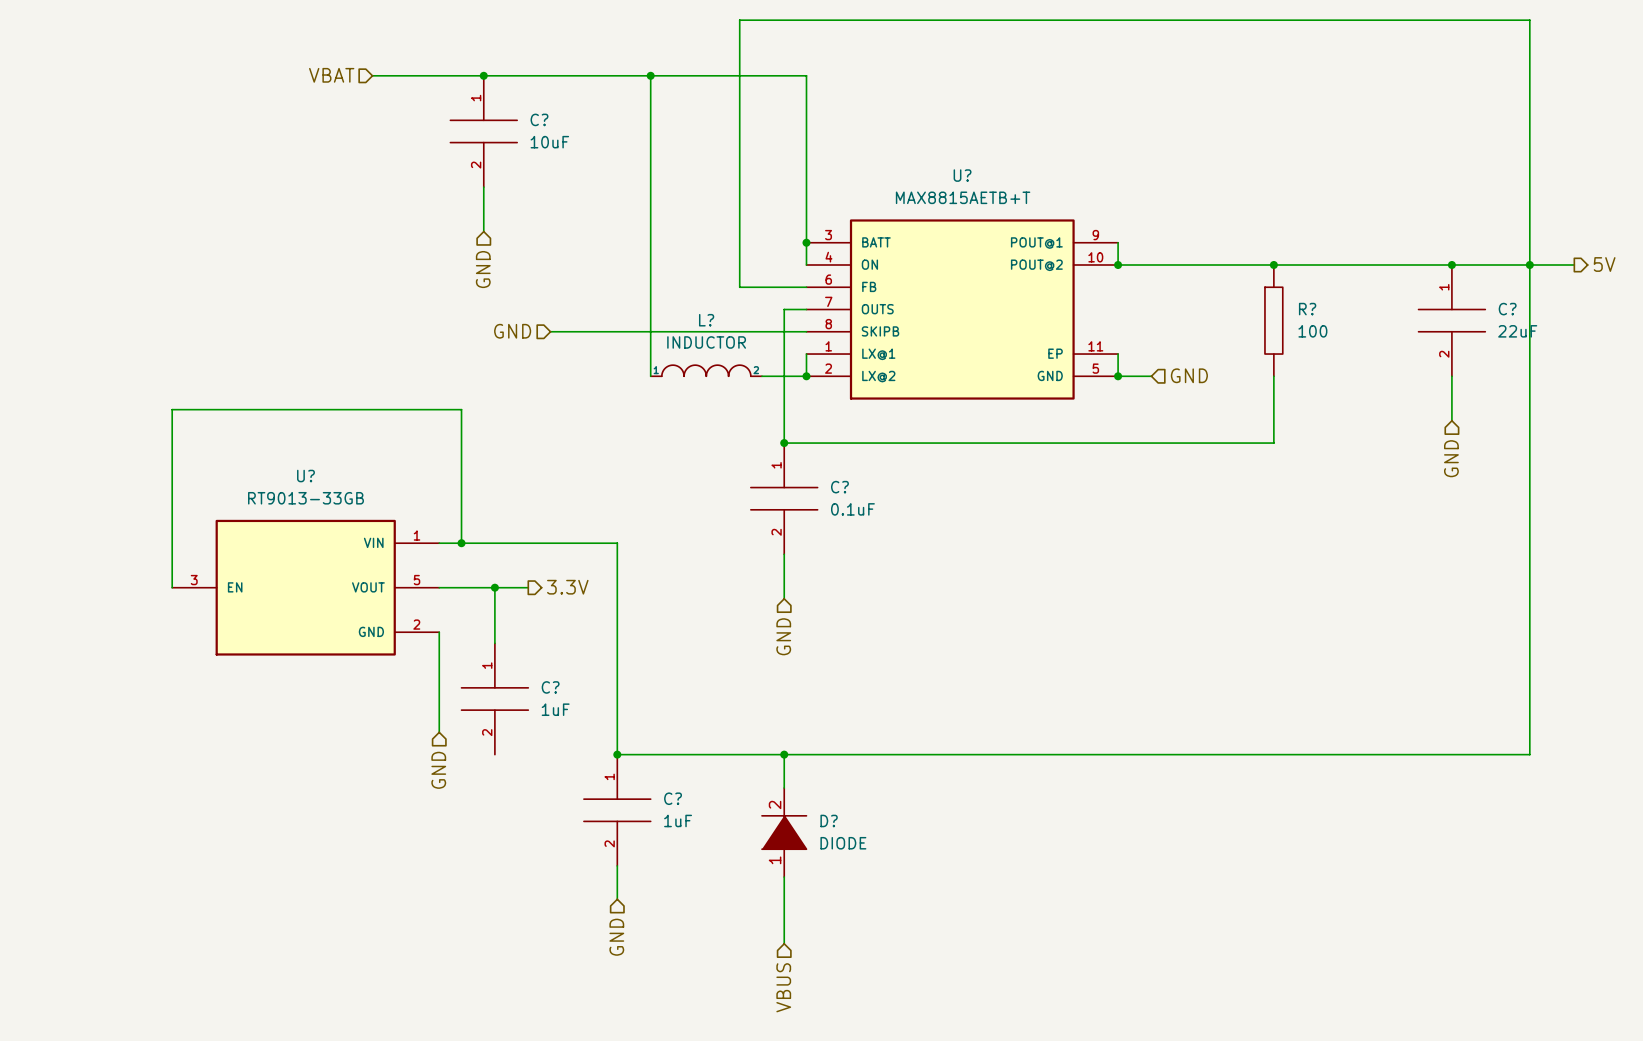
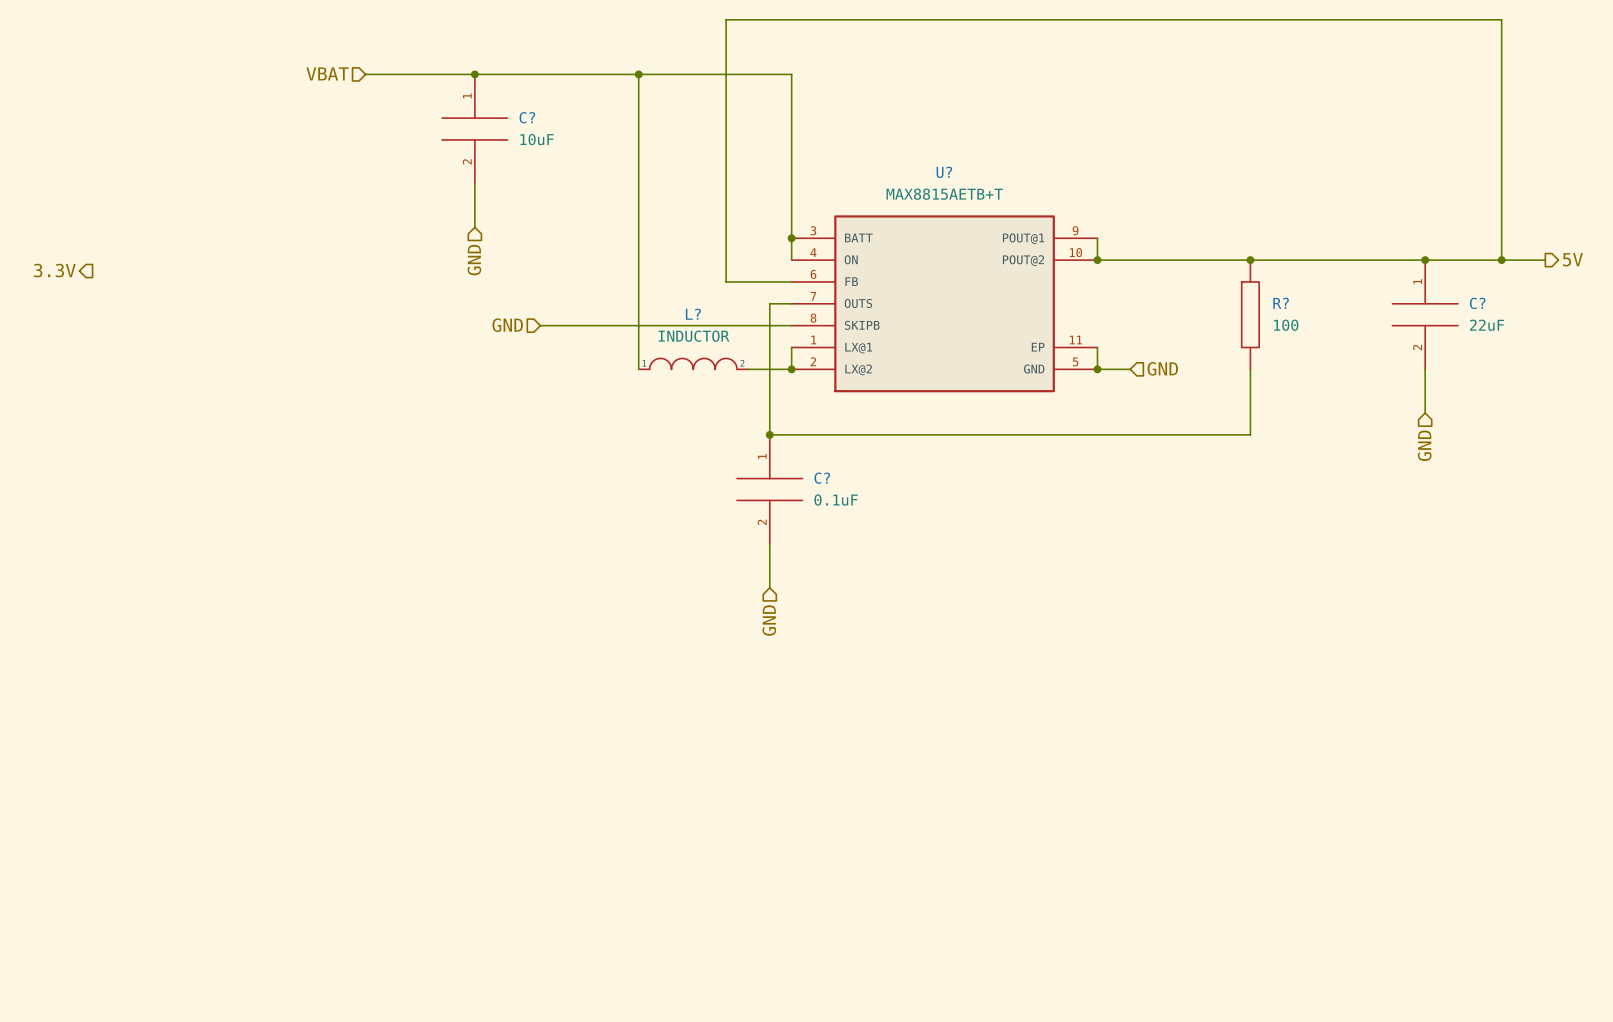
wire: (1529, 264) (1529, 754) (617, 754) (617, 543) (439, 543) -> none
hierarchical label: none -> 3.3V (54, 270)
wire: (461, 543) (461, 409) (172, 409) (172, 587) -> none
junction: (461, 543) -> none
U?: RT9013-33GB (305, 587) -> none
wire: (439, 587) (528, 587) -> none
wire: (494, 587) (494, 643) -> none
junction: (494, 587) -> none
hierarchical label: 3.3V (567, 587) -> none
wire: (439, 632) (439, 732) -> none
C?: 1uF (494, 698) -> none
junction: (617, 754) -> none
wire: (784, 754) (784, 788) -> none
junction: (784, 754) -> none
hierarchical label: GND (438, 770) -> none
C?: 1uF (617, 810) -> none
D?: DIODE (784, 832) -> none
wire: (617, 865) (617, 899) -> none
wire: (784, 877) (784, 943) -> none
hierarchical label: GND (616, 937) -> none
hierarchical label: VBUS (783, 987) -> none

